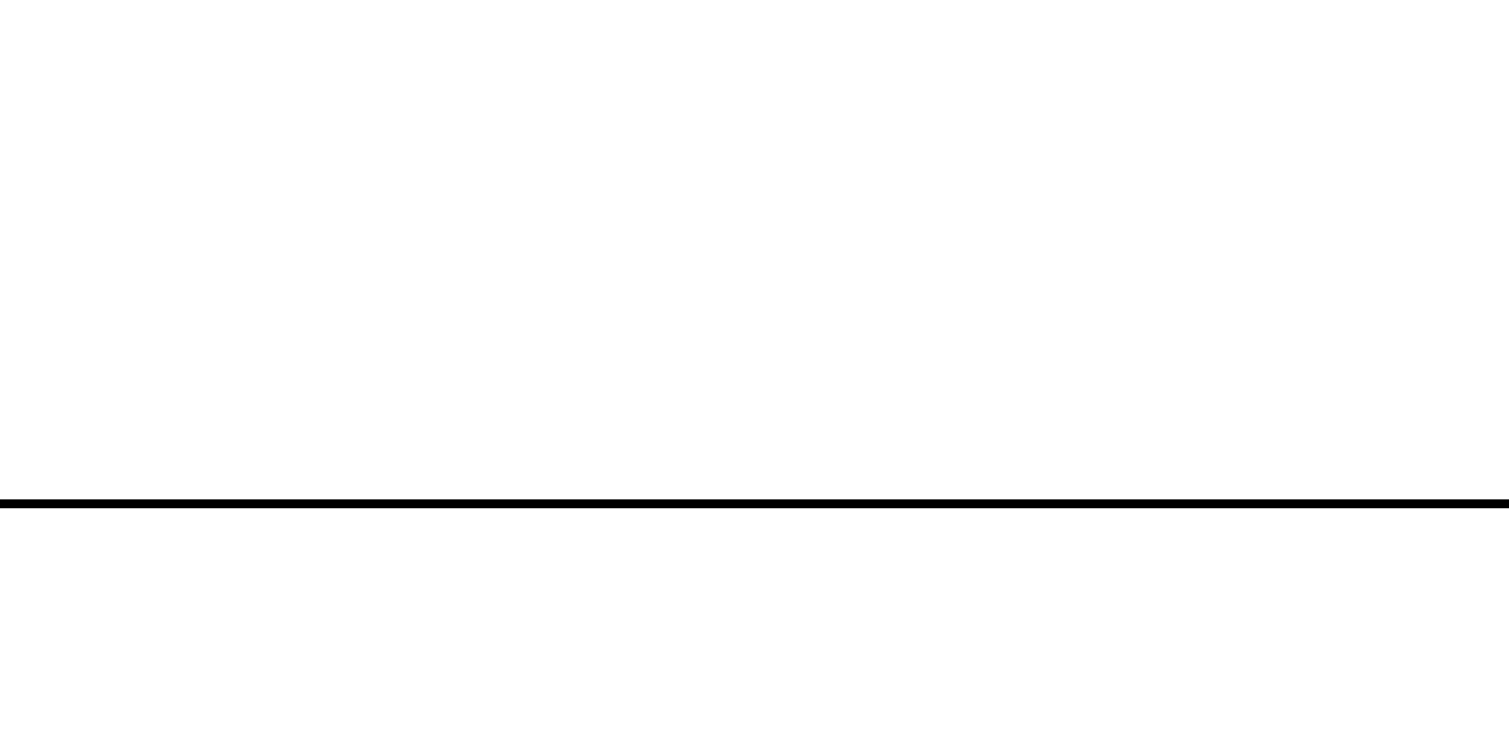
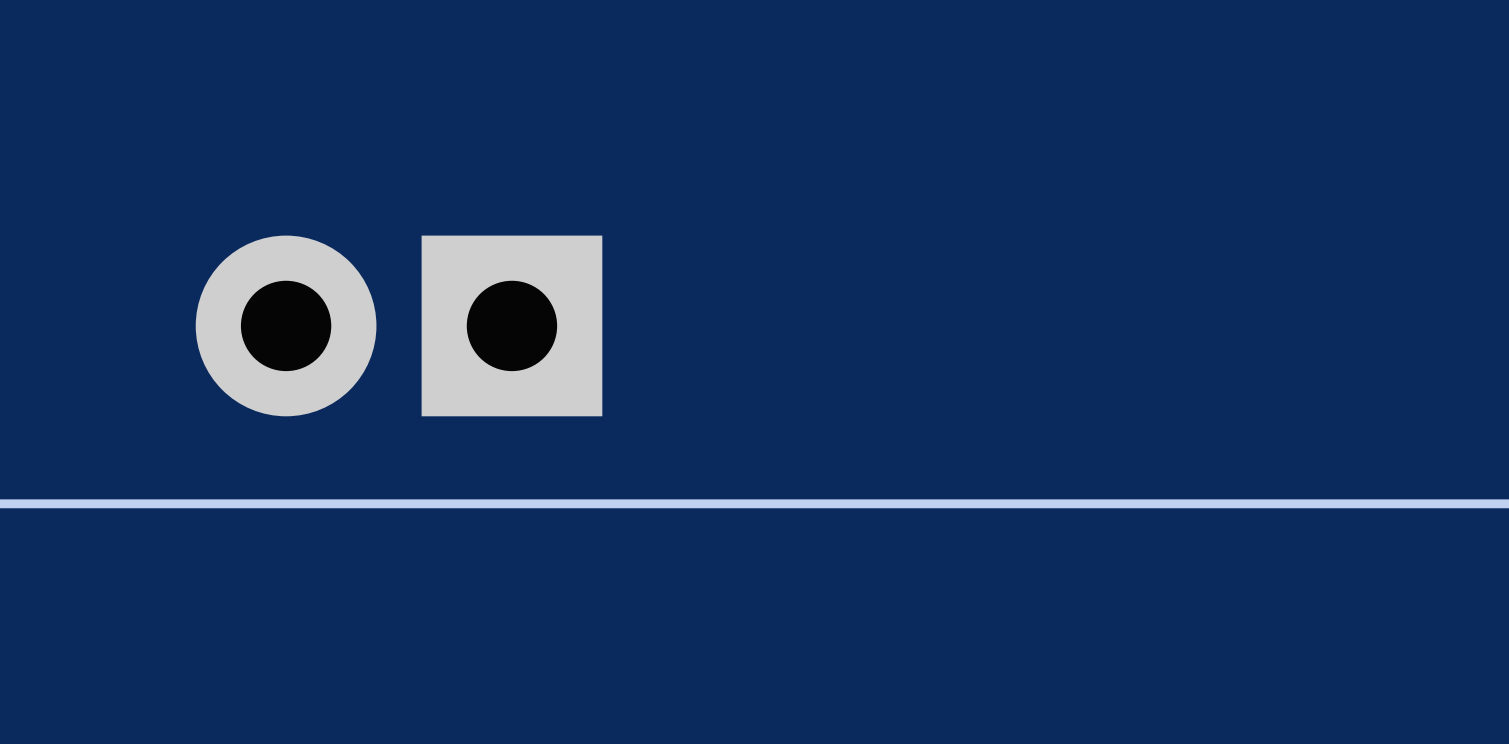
part: none -> (399, 325)

